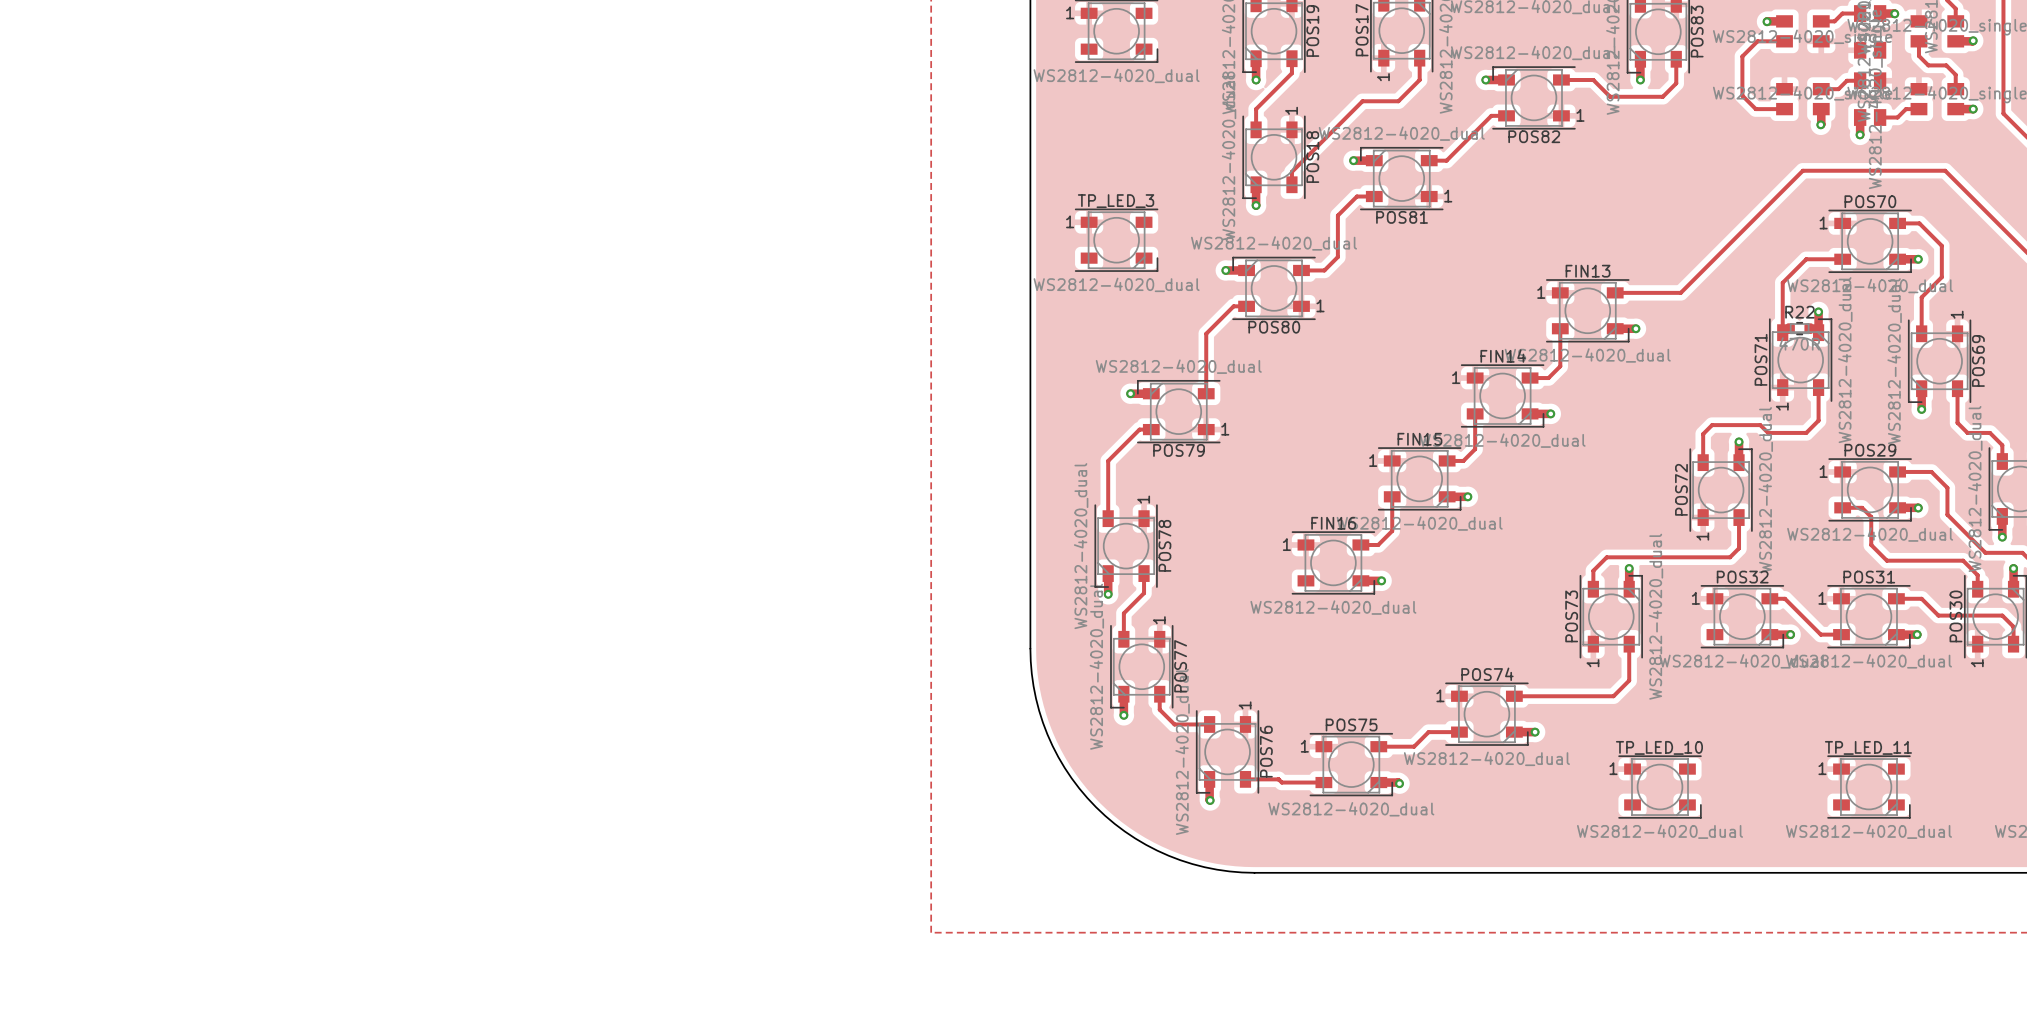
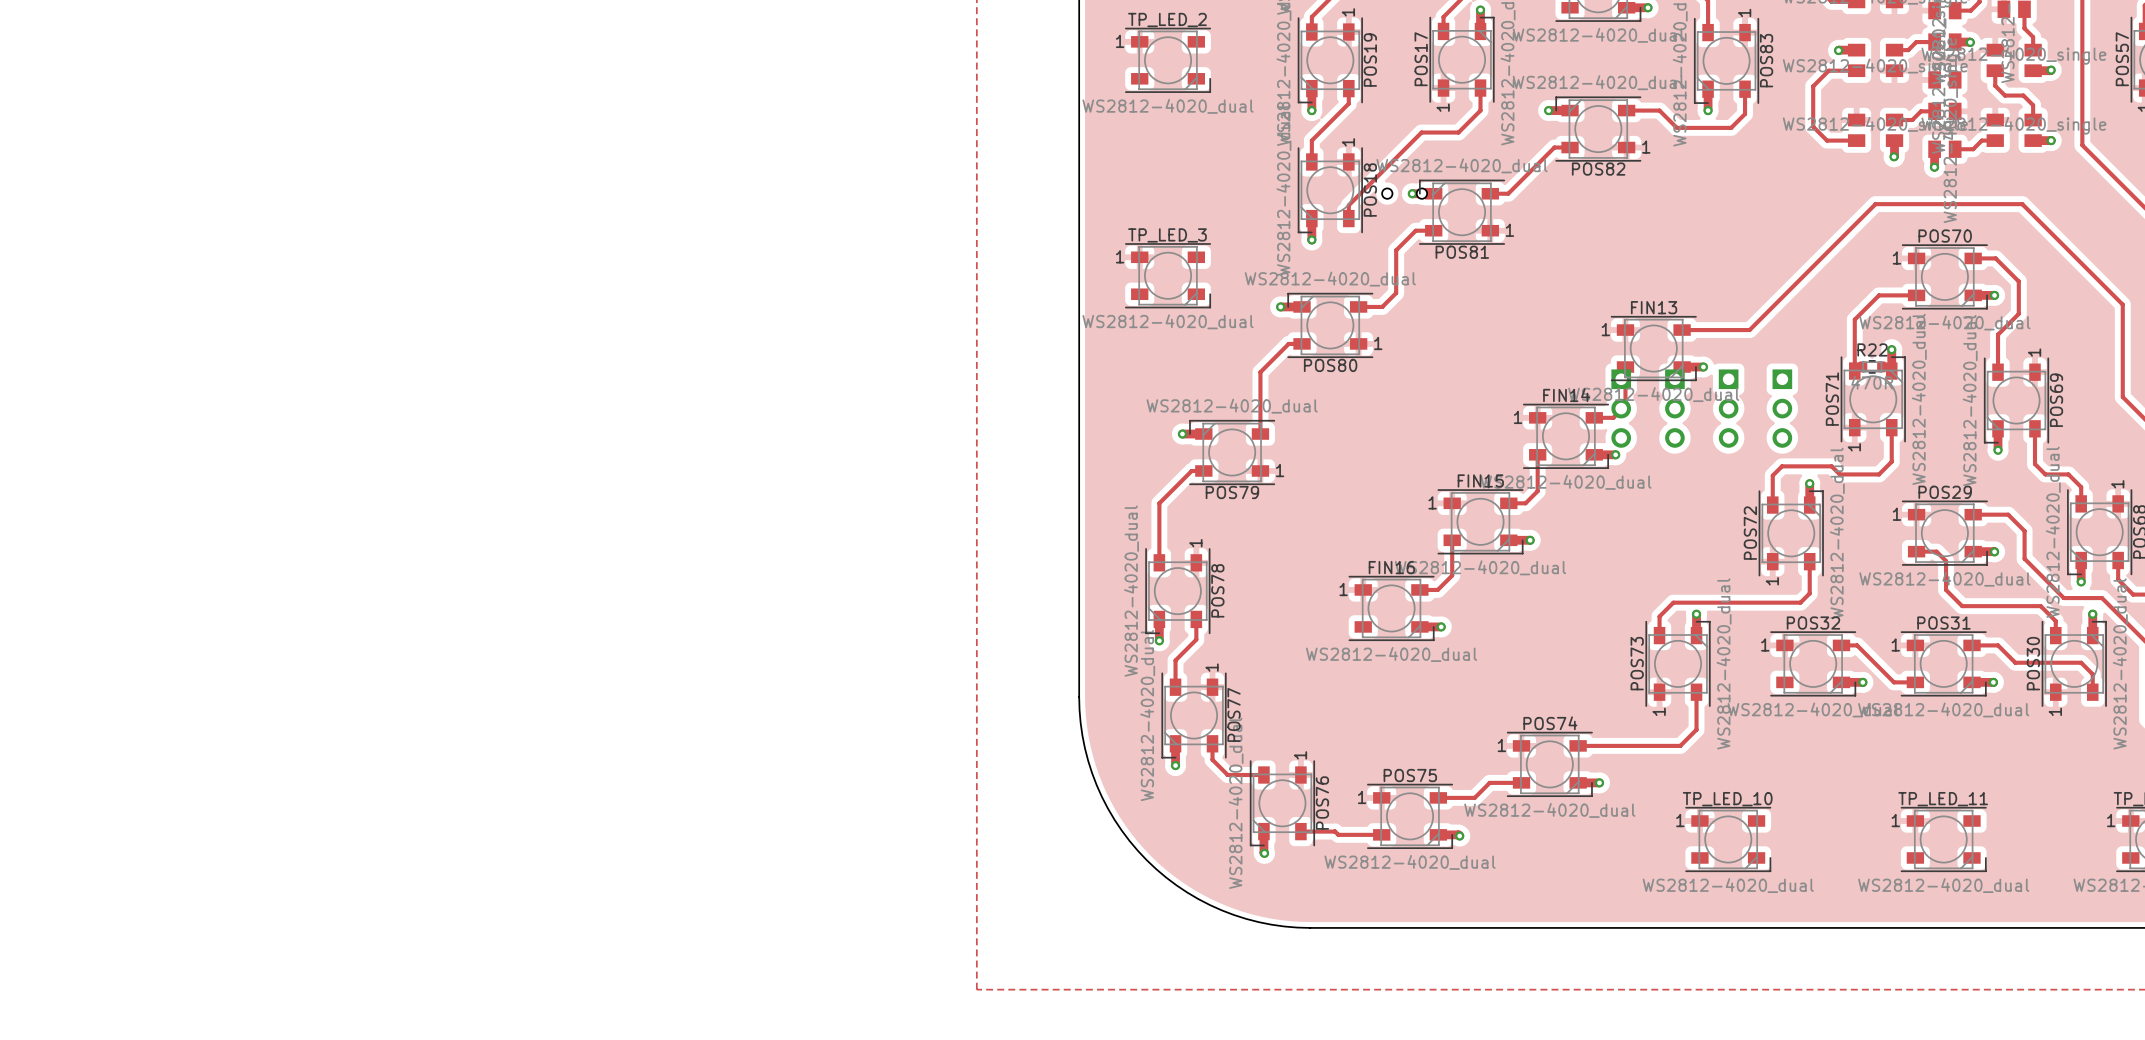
part: none -> (1404, 193)
part: none -> (1621, 408)
part: none -> (1674, 408)
part: none -> (1728, 408)
part: none -> (1782, 408)

